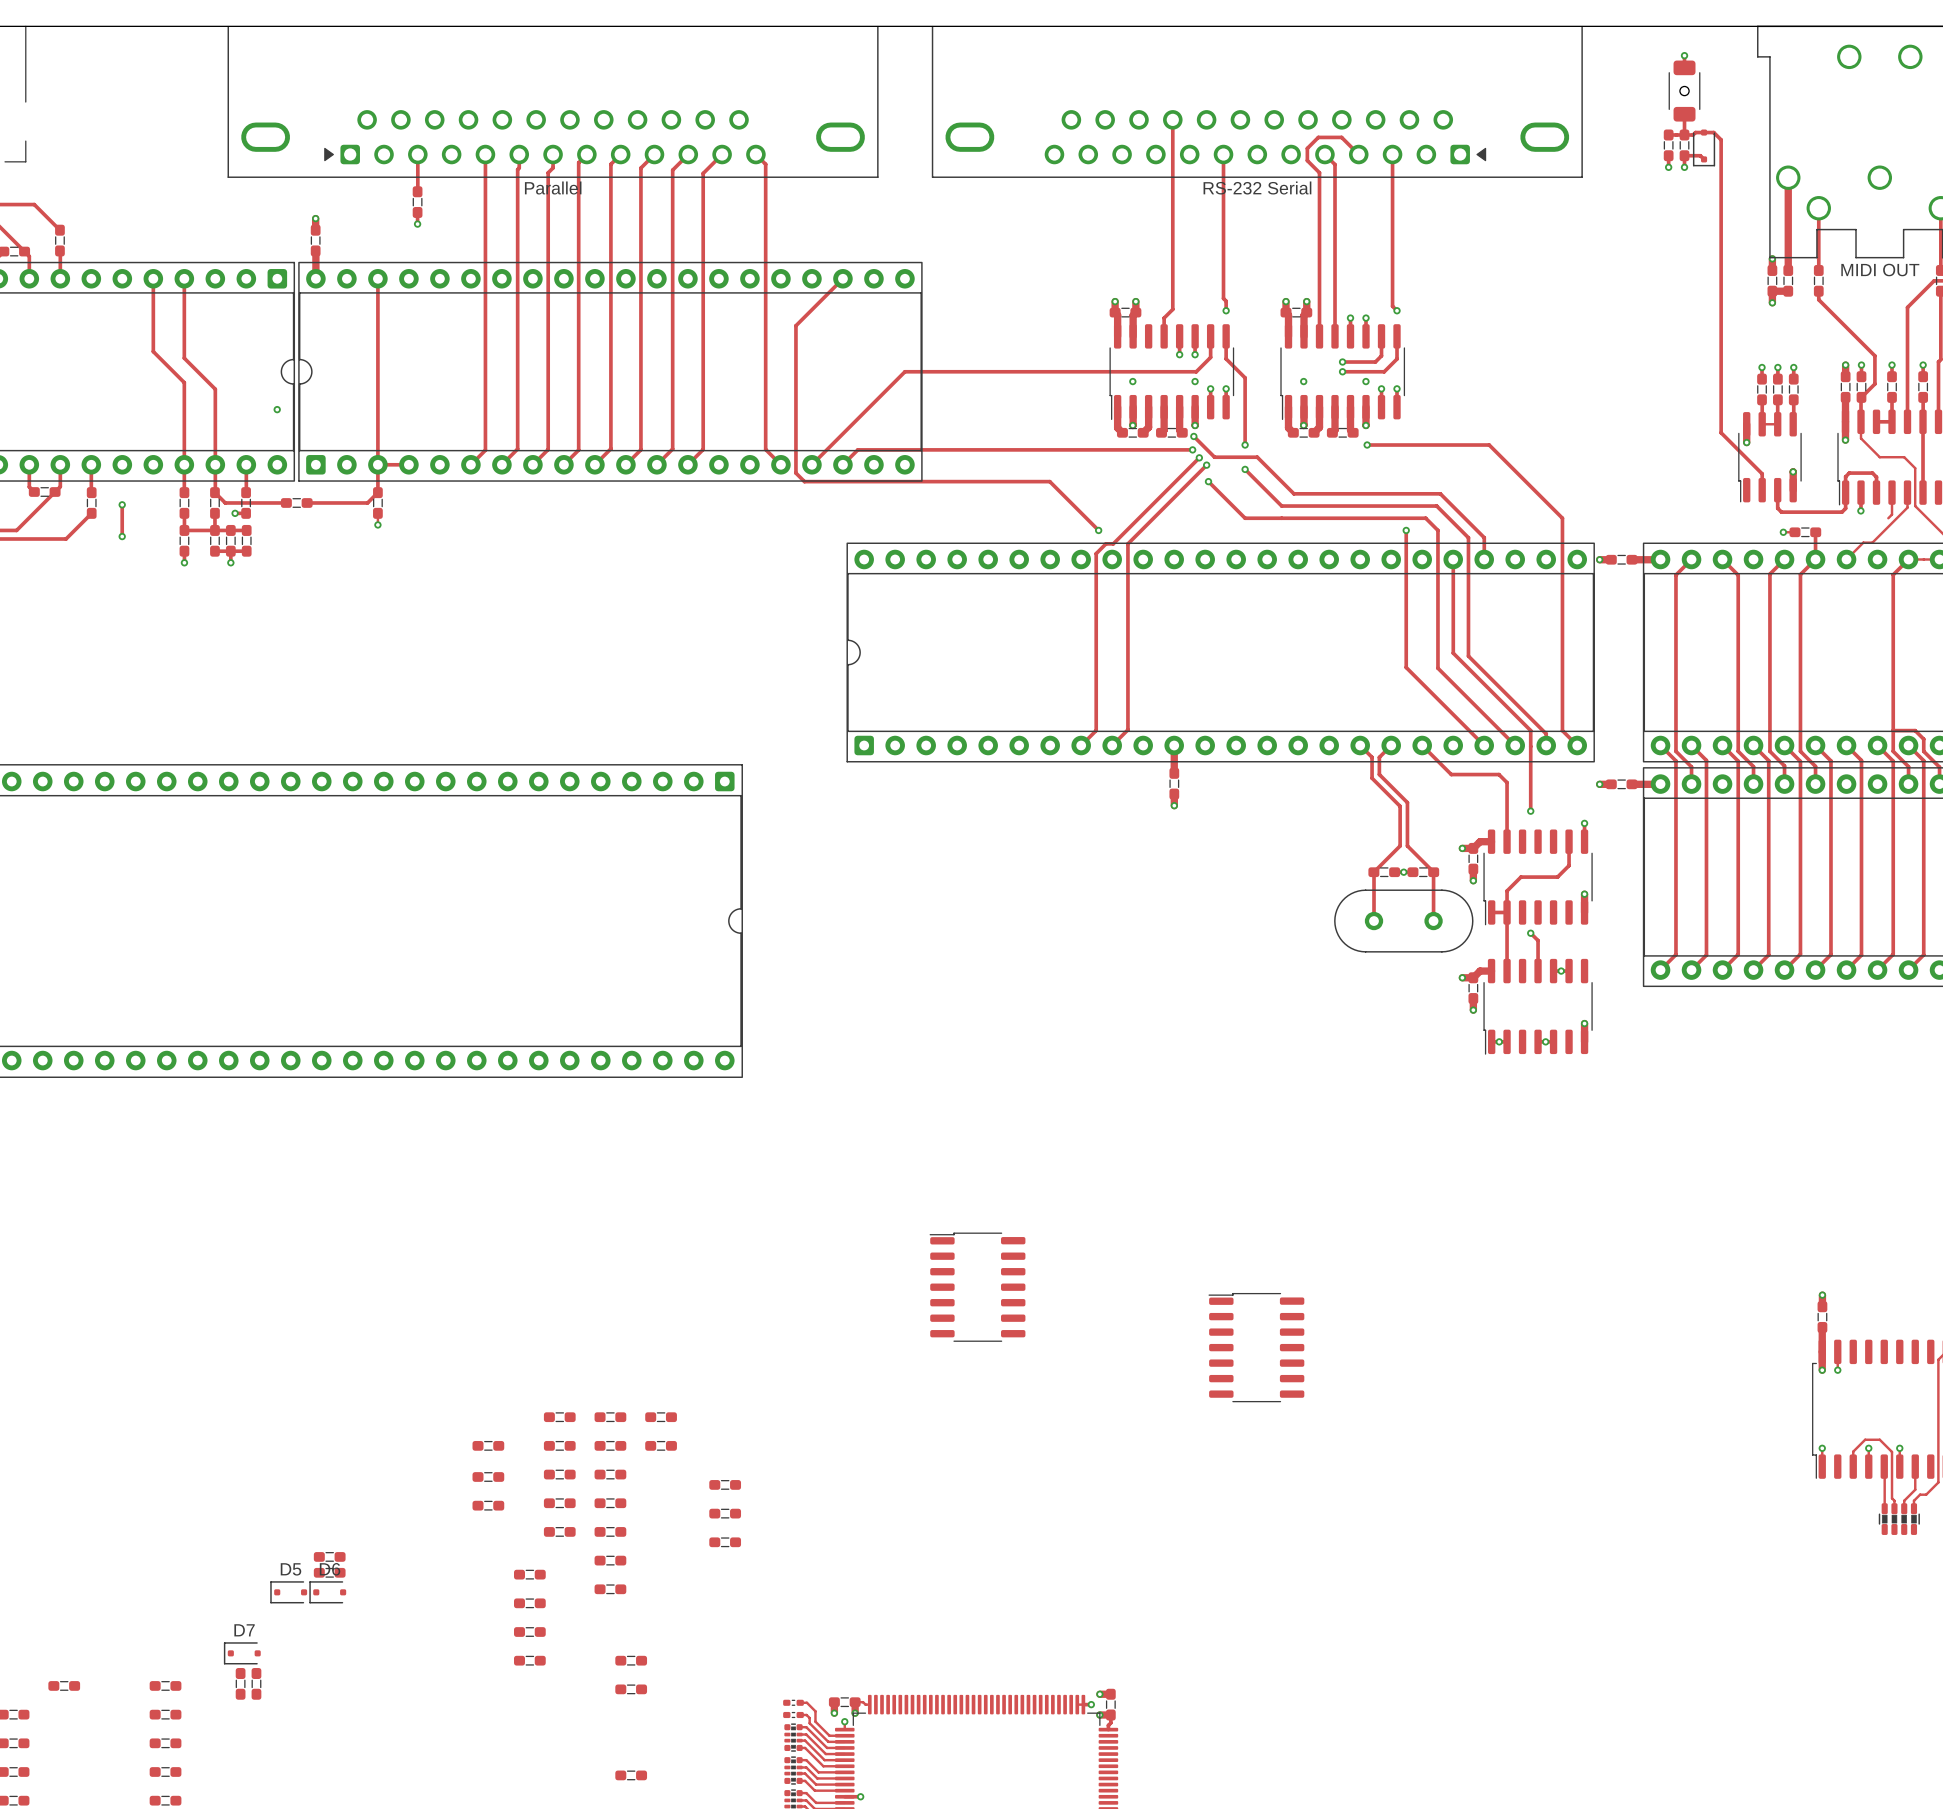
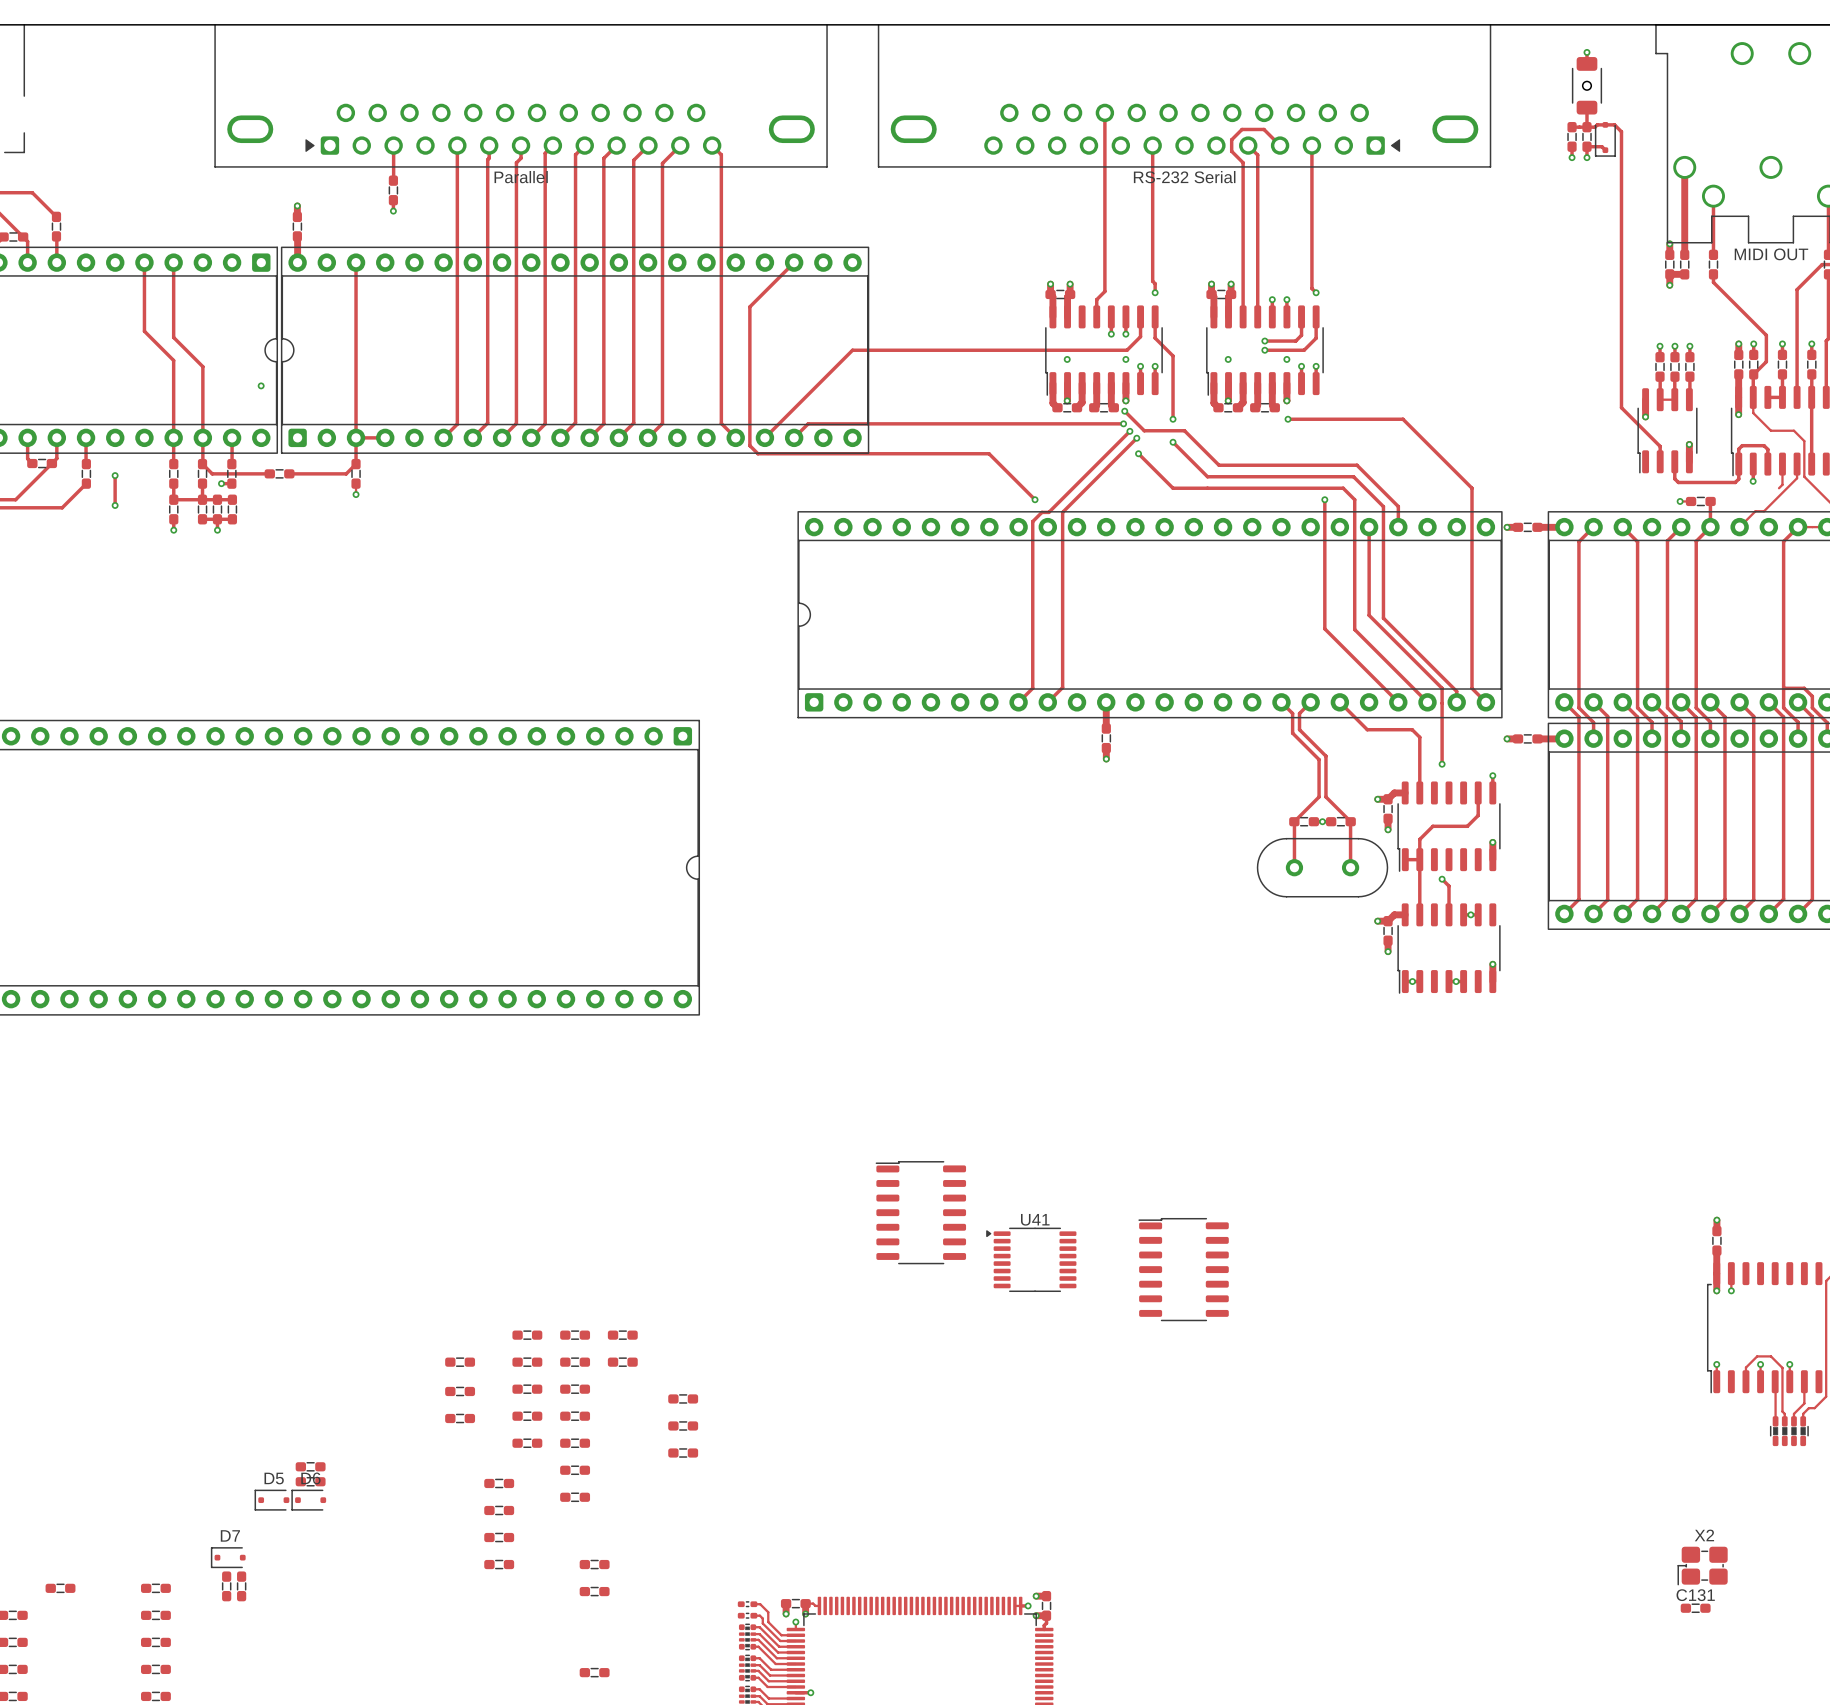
U41: none -> (1031, 1259)
X2: none -> (1702, 1566)
C131: none -> (1695, 1608)

